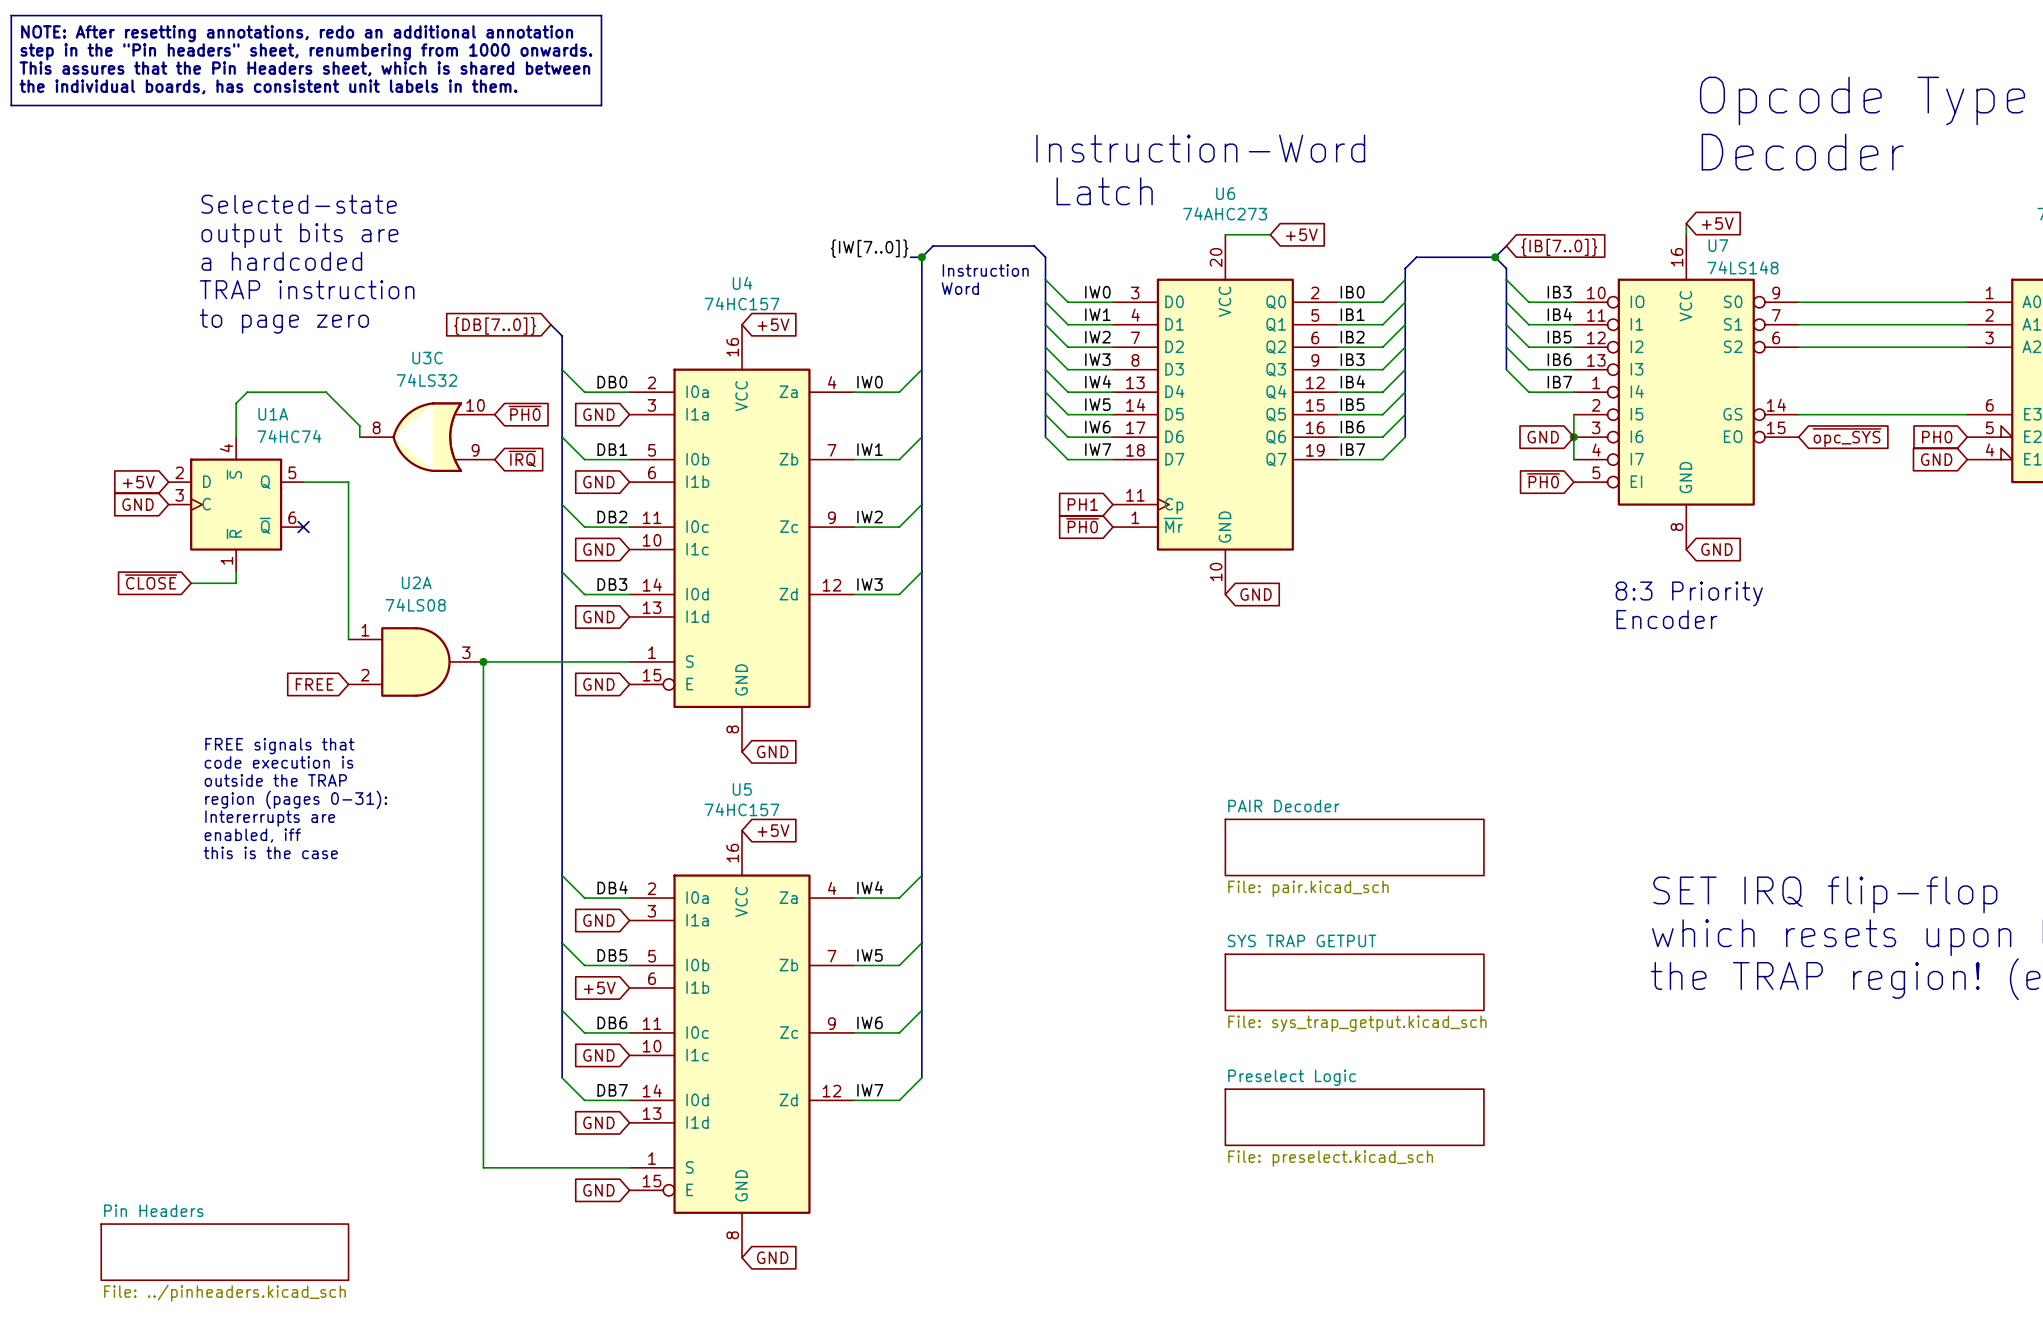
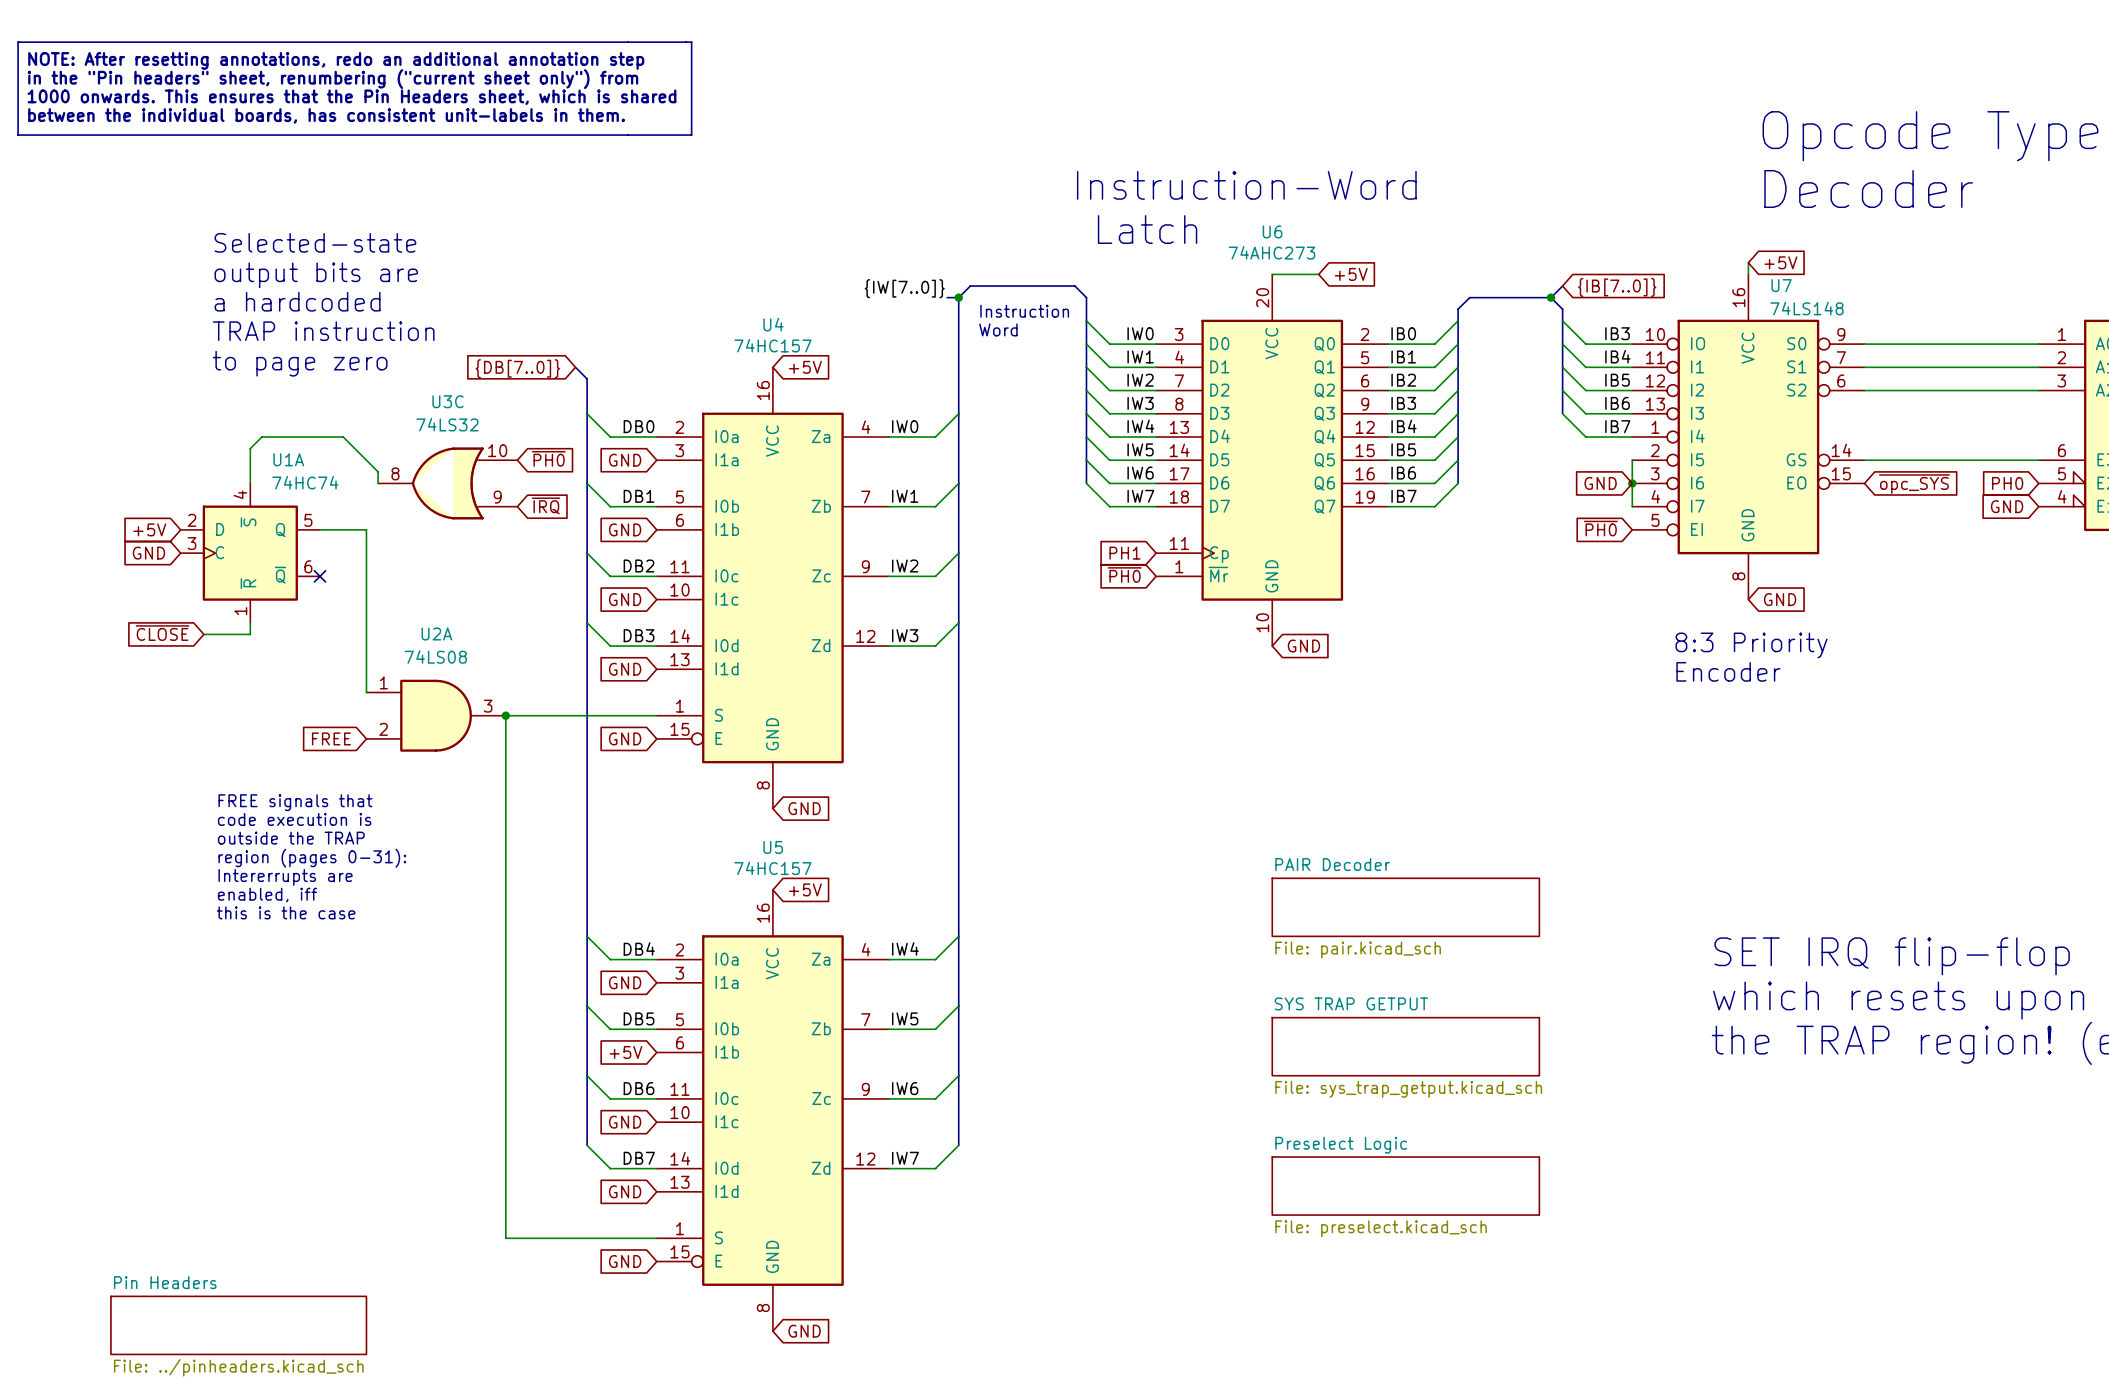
line: (11, 15) (601, 15) (601, 105) (11, 105) (11, 99) -> (18, 47) (18, 42) (691, 42) (691, 135) (18, 135)
text: NOTE: After resetting annotations, redo an additional annotation (297, 33) -> NOTE: After resetting annotations, redo an additional annotation step (336, 60)
text: step in the "Pin headers" sheet, renumbering from 1000 onwards. (306, 51) -> in the "Pin headers" sheet, renumbering ("current sheet only") from (332, 79)
text: This assures that the Pin Headers sheet, which is shared between (304, 68) -> 1000 onwards. This ensures that the Pin Headers sheet, which is shared (352, 97)
text: the individual boards, has consistent unit labels in them. (268, 86) -> between the individual boards, has consistent unit-labels in them. (326, 115)

